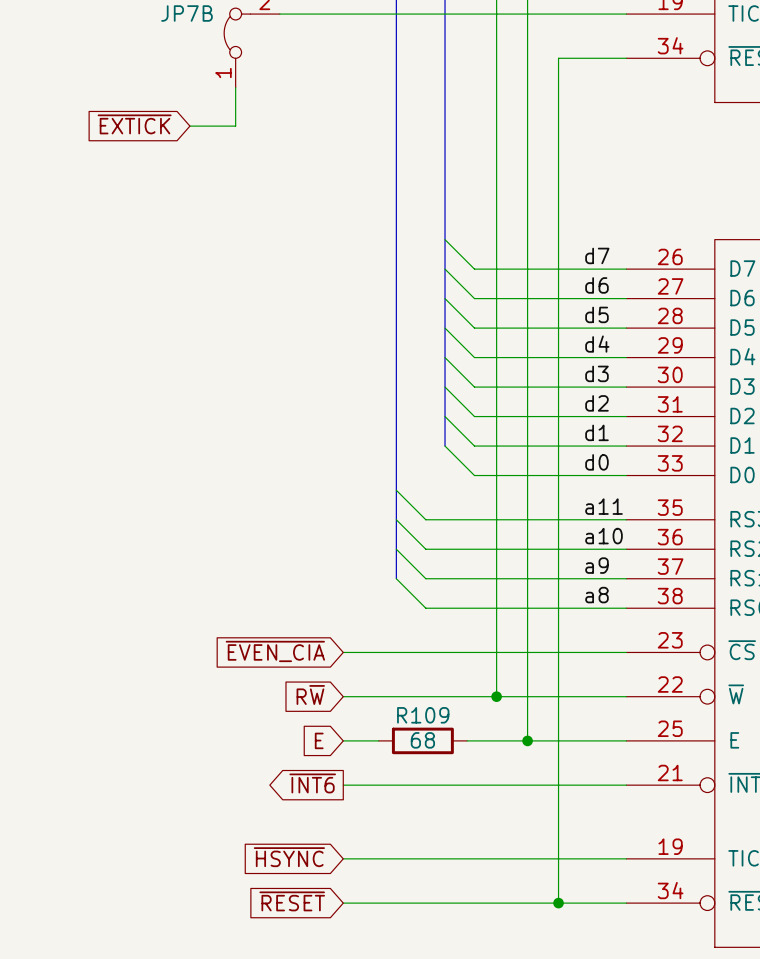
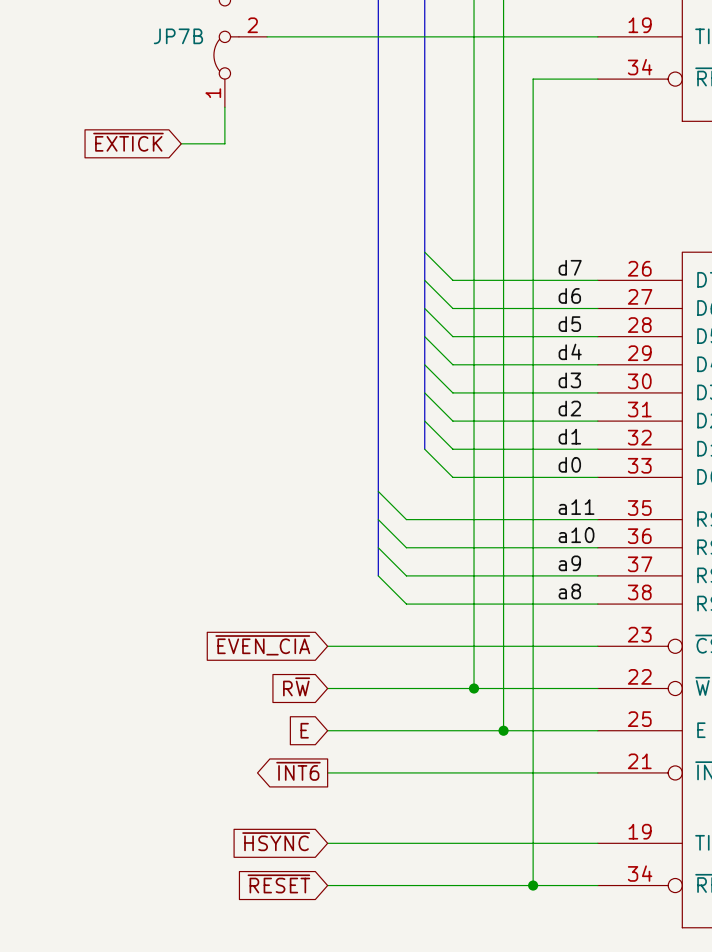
wire: none -> (361, 730) (445, 730)
R109: 68 (422, 740) -> none

